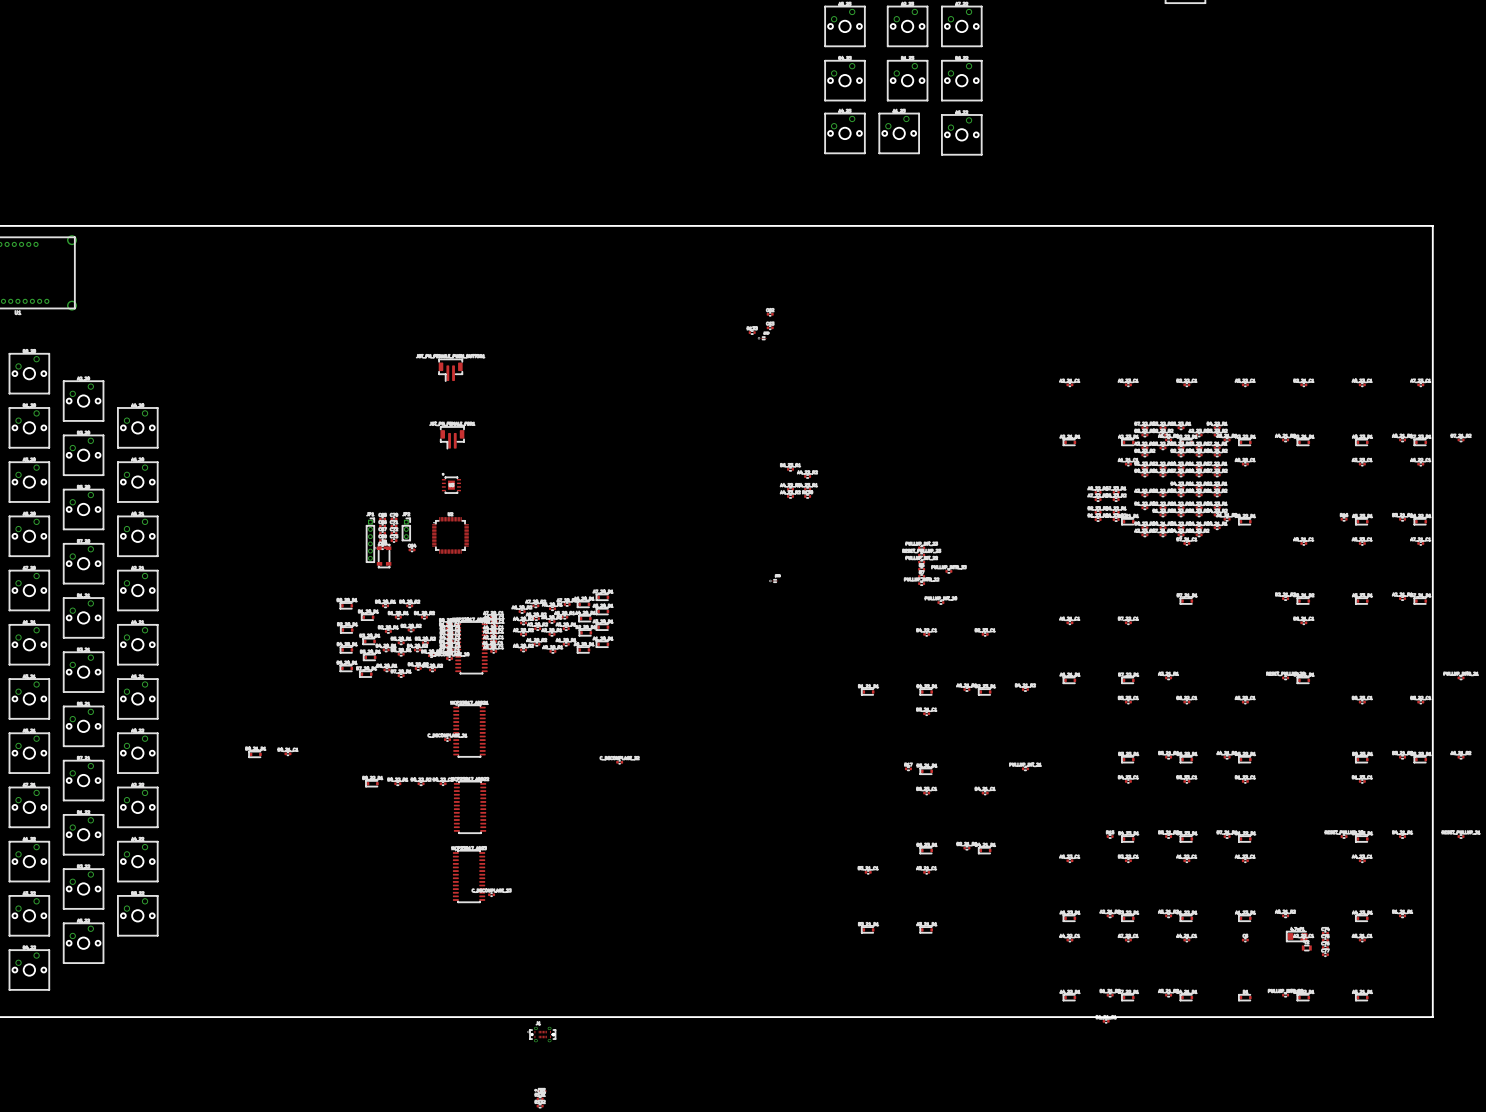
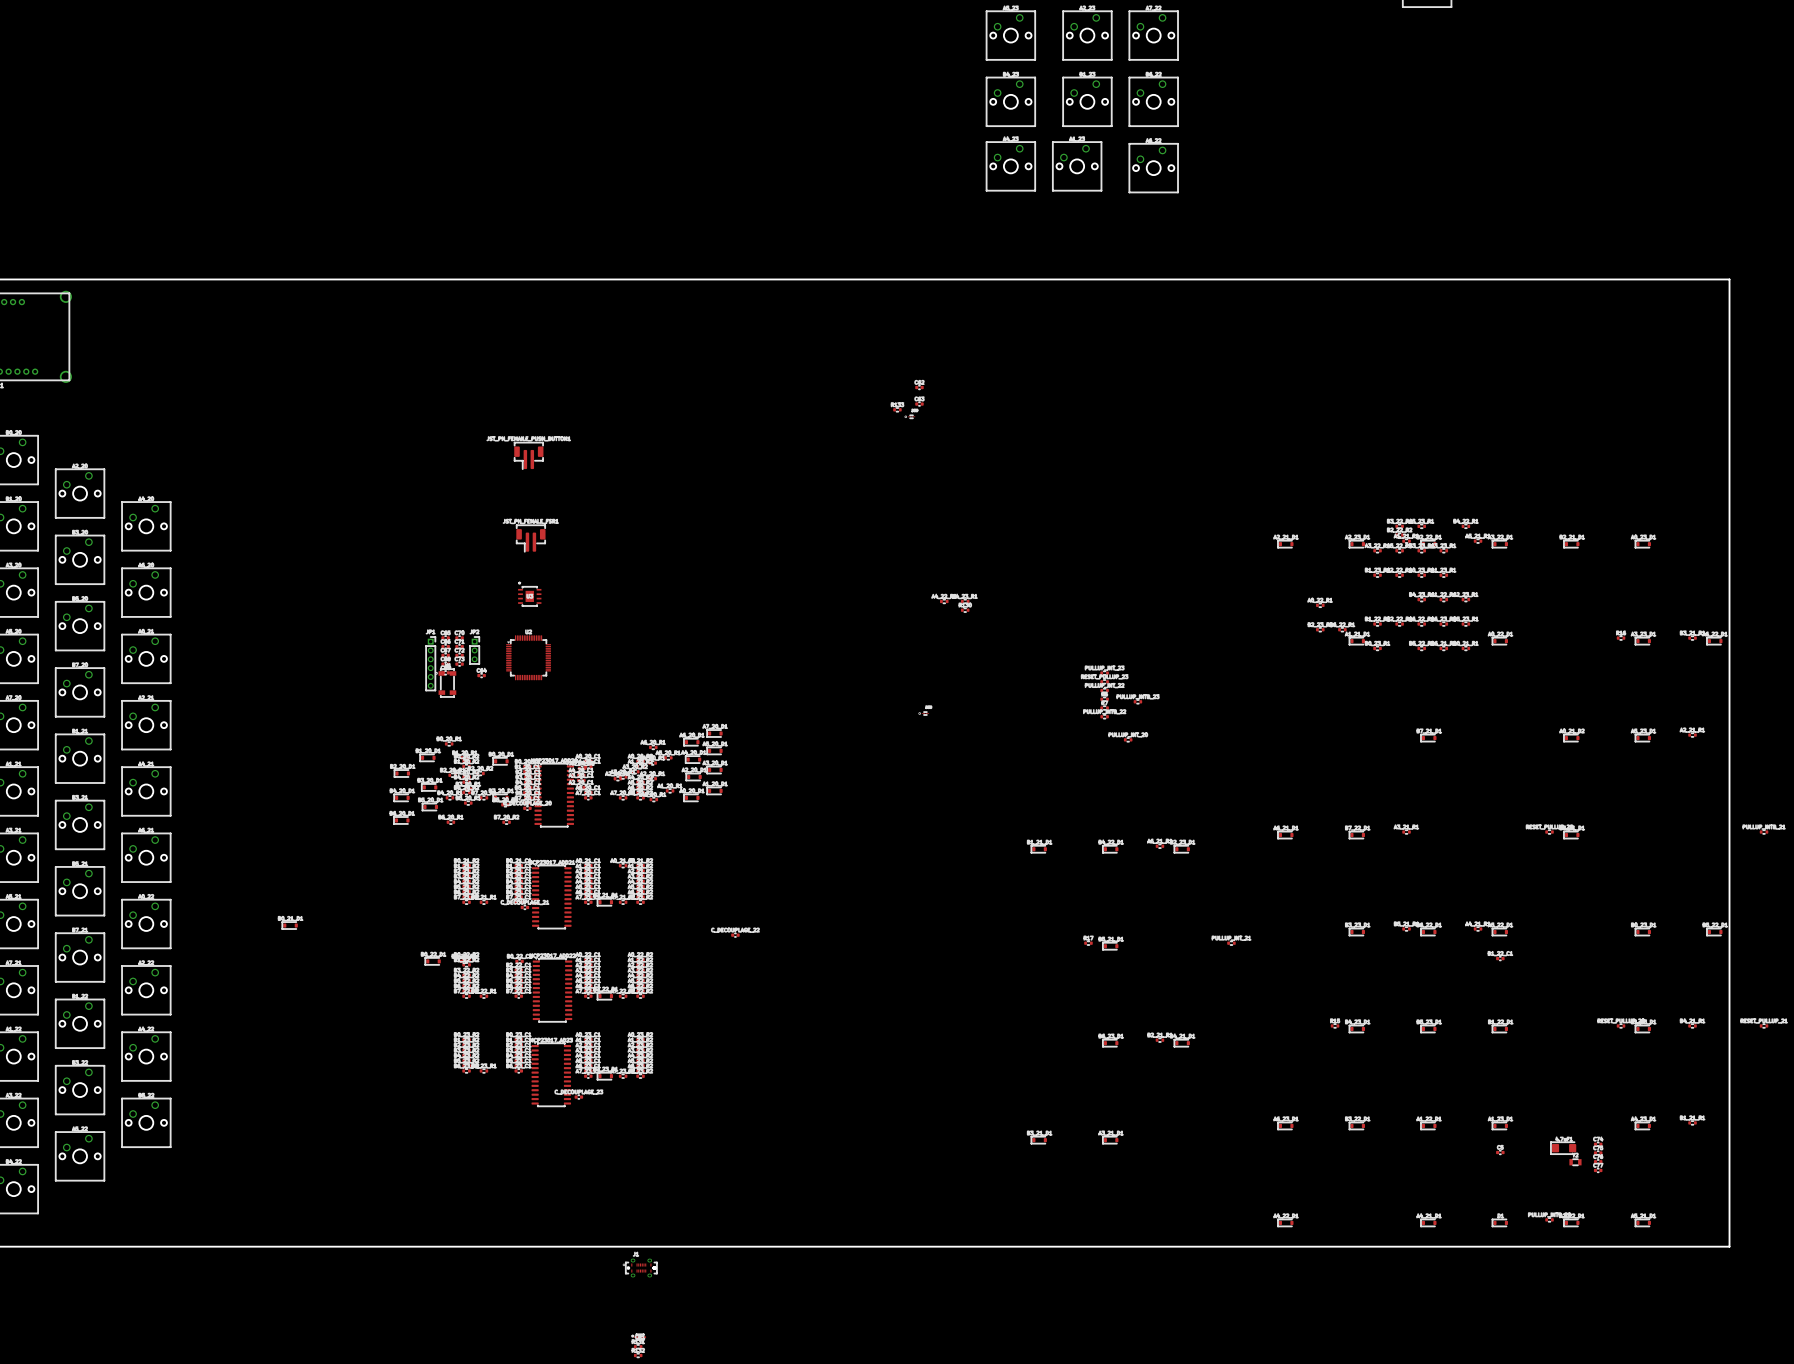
part position: (1069, 384) -> (588, 876)
part position: (1128, 384) -> (588, 1050)
part position: (1186, 384) -> (518, 970)
part position: (1245, 384) -> (588, 975)
part position: (1303, 384) -> (518, 876)
part position: (1362, 384) -> (588, 1039)
part position: (1420, 384) -> (588, 1076)
part position: (1144, 427) -> (483, 996)
part position: (1144, 435) -> (466, 985)
part position: (1199, 435) -> (640, 1050)
part position: (1217, 435) -> (466, 975)
part position: (1285, 439) -> (640, 886)
part position: (1402, 439) -> (623, 865)
part position: (1461, 439) -> (466, 902)
part position: (1420, 442) -> (605, 1076)
part position: (1217, 447) -> (623, 902)
part position: (1144, 454) -> (466, 990)
part position: (1181, 454) -> (466, 1050)
part position: (1199, 454) -> (466, 1070)
part position: (1217, 454) -> (466, 897)
part position: (1128, 464) -> (588, 870)
part position: (1245, 464) -> (588, 959)
part position: (1362, 464) -> (588, 1055)
part position: (1420, 464) -> (588, 990)
part position: (1217, 467) -> (623, 996)
part position: (790, 469) -> (483, 1070)
part position: (1144, 474) -> (466, 1039)
part position: (1162, 474) -> (640, 964)
part position: (1181, 474) -> (640, 1076)
part position: (1199, 474) -> (640, 1039)
part position: (1217, 474) -> (466, 996)
part position: (807, 476) -> (640, 980)
part position: (1116, 492) -> (623, 1076)
part position: (1144, 494) -> (640, 975)
part position: (1162, 494) -> (640, 970)
part position: (1181, 494) -> (466, 1055)
part position: (1199, 494) -> (640, 959)
part position: (1217, 494) -> (640, 1044)
part position: (790, 496) -> (640, 1060)
part position: (1098, 499) -> (640, 996)
part position: (1116, 499) -> (466, 1065)
part position: (1162, 514) -> (466, 964)
part position: (1181, 514) -> (640, 985)
part position: (1199, 514) -> (640, 1065)
part position: (1217, 514) -> (466, 1060)
part position: (1098, 519) -> (466, 1044)
part position: (1116, 519) -> (640, 1070)
part position: (1227, 519) -> (640, 870)
part position: (1162, 527) -> (466, 865)
part position: (1144, 534) -> (640, 1055)
part position: (1162, 534) -> (640, 902)
part position: (1181, 534) -> (466, 980)
part position: (1199, 534) -> (640, 990)
part position: (1186, 543) -> (518, 902)
part position: (1303, 543) -> (588, 865)
part position: (1362, 543) -> (588, 1065)
part position: (1420, 543) -> (588, 902)
part position: (1285, 598) -> (466, 876)
part position: (1420, 601) -> (605, 902)
part position: (567, 604) -> (623, 797)
part position: (346, 605) -> (500, 761)
part position: (409, 605) -> (466, 761)
part position: (535, 605) -> (640, 797)
part position: (522, 611) -> (640, 792)
part position: (424, 617) -> (466, 766)
part position: (493, 617) -> (588, 797)
part position: (536, 618) -> (640, 787)
part position: (494, 621) -> (588, 792)
part position: (523, 622) -> (640, 782)
part position: (1069, 622) -> (588, 897)
part position: (1128, 622) -> (518, 996)
part position: (1303, 622) -> (518, 897)
part position: (566, 628) -> (623, 776)
part position: (926, 634) -> (518, 980)
part position: (985, 634) -> (518, 1050)
part position: (425, 642) -> (466, 776)
part position: (536, 644) -> (640, 766)
part position: (493, 647) -> (588, 766)
part position: (417, 649) -> (466, 782)
part position: (523, 649) -> (640, 761)
part position: (493, 651) -> (588, 761)
part position: (418, 668) -> (466, 792)
part position: (366, 674) -> (500, 797)
part position: (401, 675) -> (483, 797)
part position: (1025, 689) -> (466, 886)
part position: (1128, 702) -> (518, 1055)
part position: (1186, 702) -> (518, 990)
part position: (1245, 702) -> (588, 985)
part position: (1362, 702) -> (518, 1039)
part position: (1420, 702) -> (518, 985)
part position: (926, 713) -> (518, 891)
part position: (287, 753) -> (518, 865)
part position: (1402, 757) -> (466, 881)
part position: (1461, 757) -> (640, 897)
part position: (1128, 781) -> (518, 1060)
part position: (1186, 781) -> (518, 1065)
part position: (1362, 781) -> (518, 1044)
part position: (421, 783) -> (466, 959)
part position: (926, 793) -> (518, 1070)
part position: (985, 793) -> (518, 886)
part position: (1168, 836) -> (466, 891)
part position: (1227, 836) -> (483, 902)
part position: (1069, 860) -> (588, 1070)
part position: (1128, 860) -> (518, 975)
part position: (1186, 860) -> (588, 964)
part position: (1245, 860) -> (588, 1044)
part position: (1362, 860) -> (588, 1060)
part position: (868, 872) -> (518, 881)
part position: (926, 872) -> (588, 881)
part position: (1110, 915) -> (640, 876)
part position: (1168, 915) -> (640, 891)
part position: (1285, 915) -> (640, 865)
part position: (1069, 940) -> (588, 980)
part position: (1128, 940) -> (588, 996)
part position: (1186, 940) -> (588, 886)
part position: (1303, 940) -> (588, 970)
part position: (1362, 940) -> (588, 891)
part position: (1110, 995) -> (466, 870)
part position: (1168, 995) -> (640, 881)
part position: (1128, 997) -> (605, 996)
part position: (1106, 1021) -> (518, 870)

